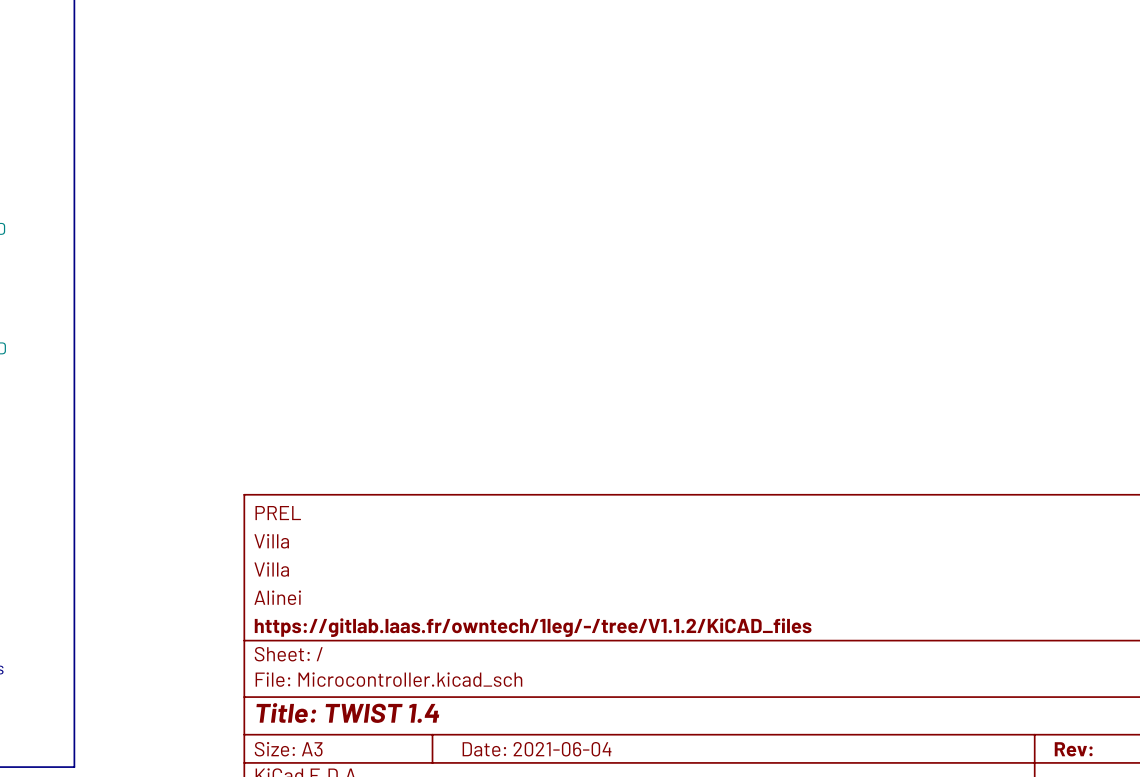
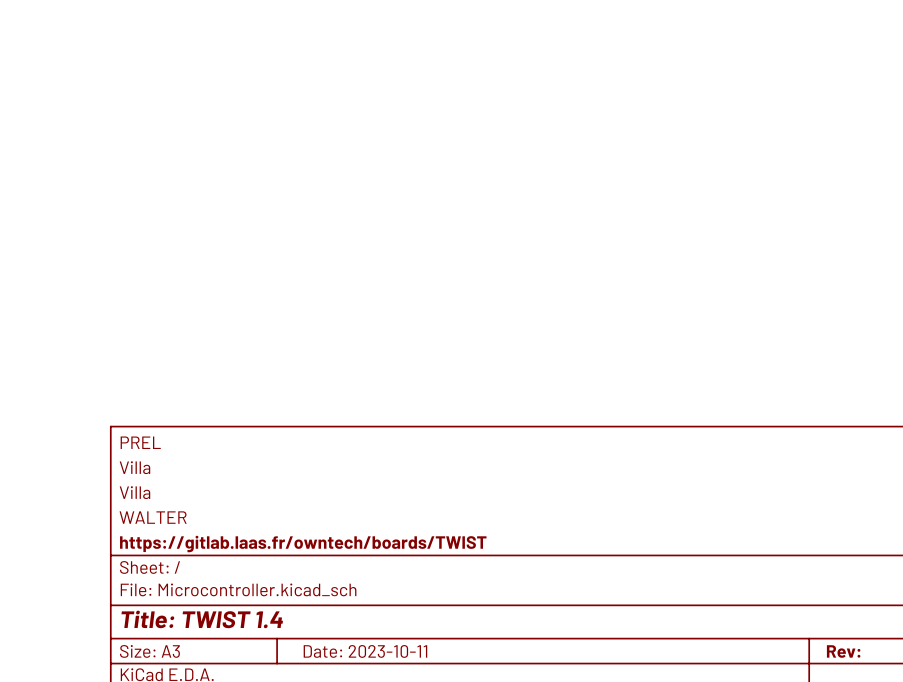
title block: Alinei (277, 597) -> WALTER (153, 517)
title block: https://gitlab.laas.fr/owntech/1leg/-/tree/V1.1.2/KiCAD_files (533, 627) -> https://gitlab.laas.fr/owntech/boards/TWIST (303, 544)
title block: Date: 2021-06-04 (537, 749) -> Date: 2023-10-11 (365, 651)

